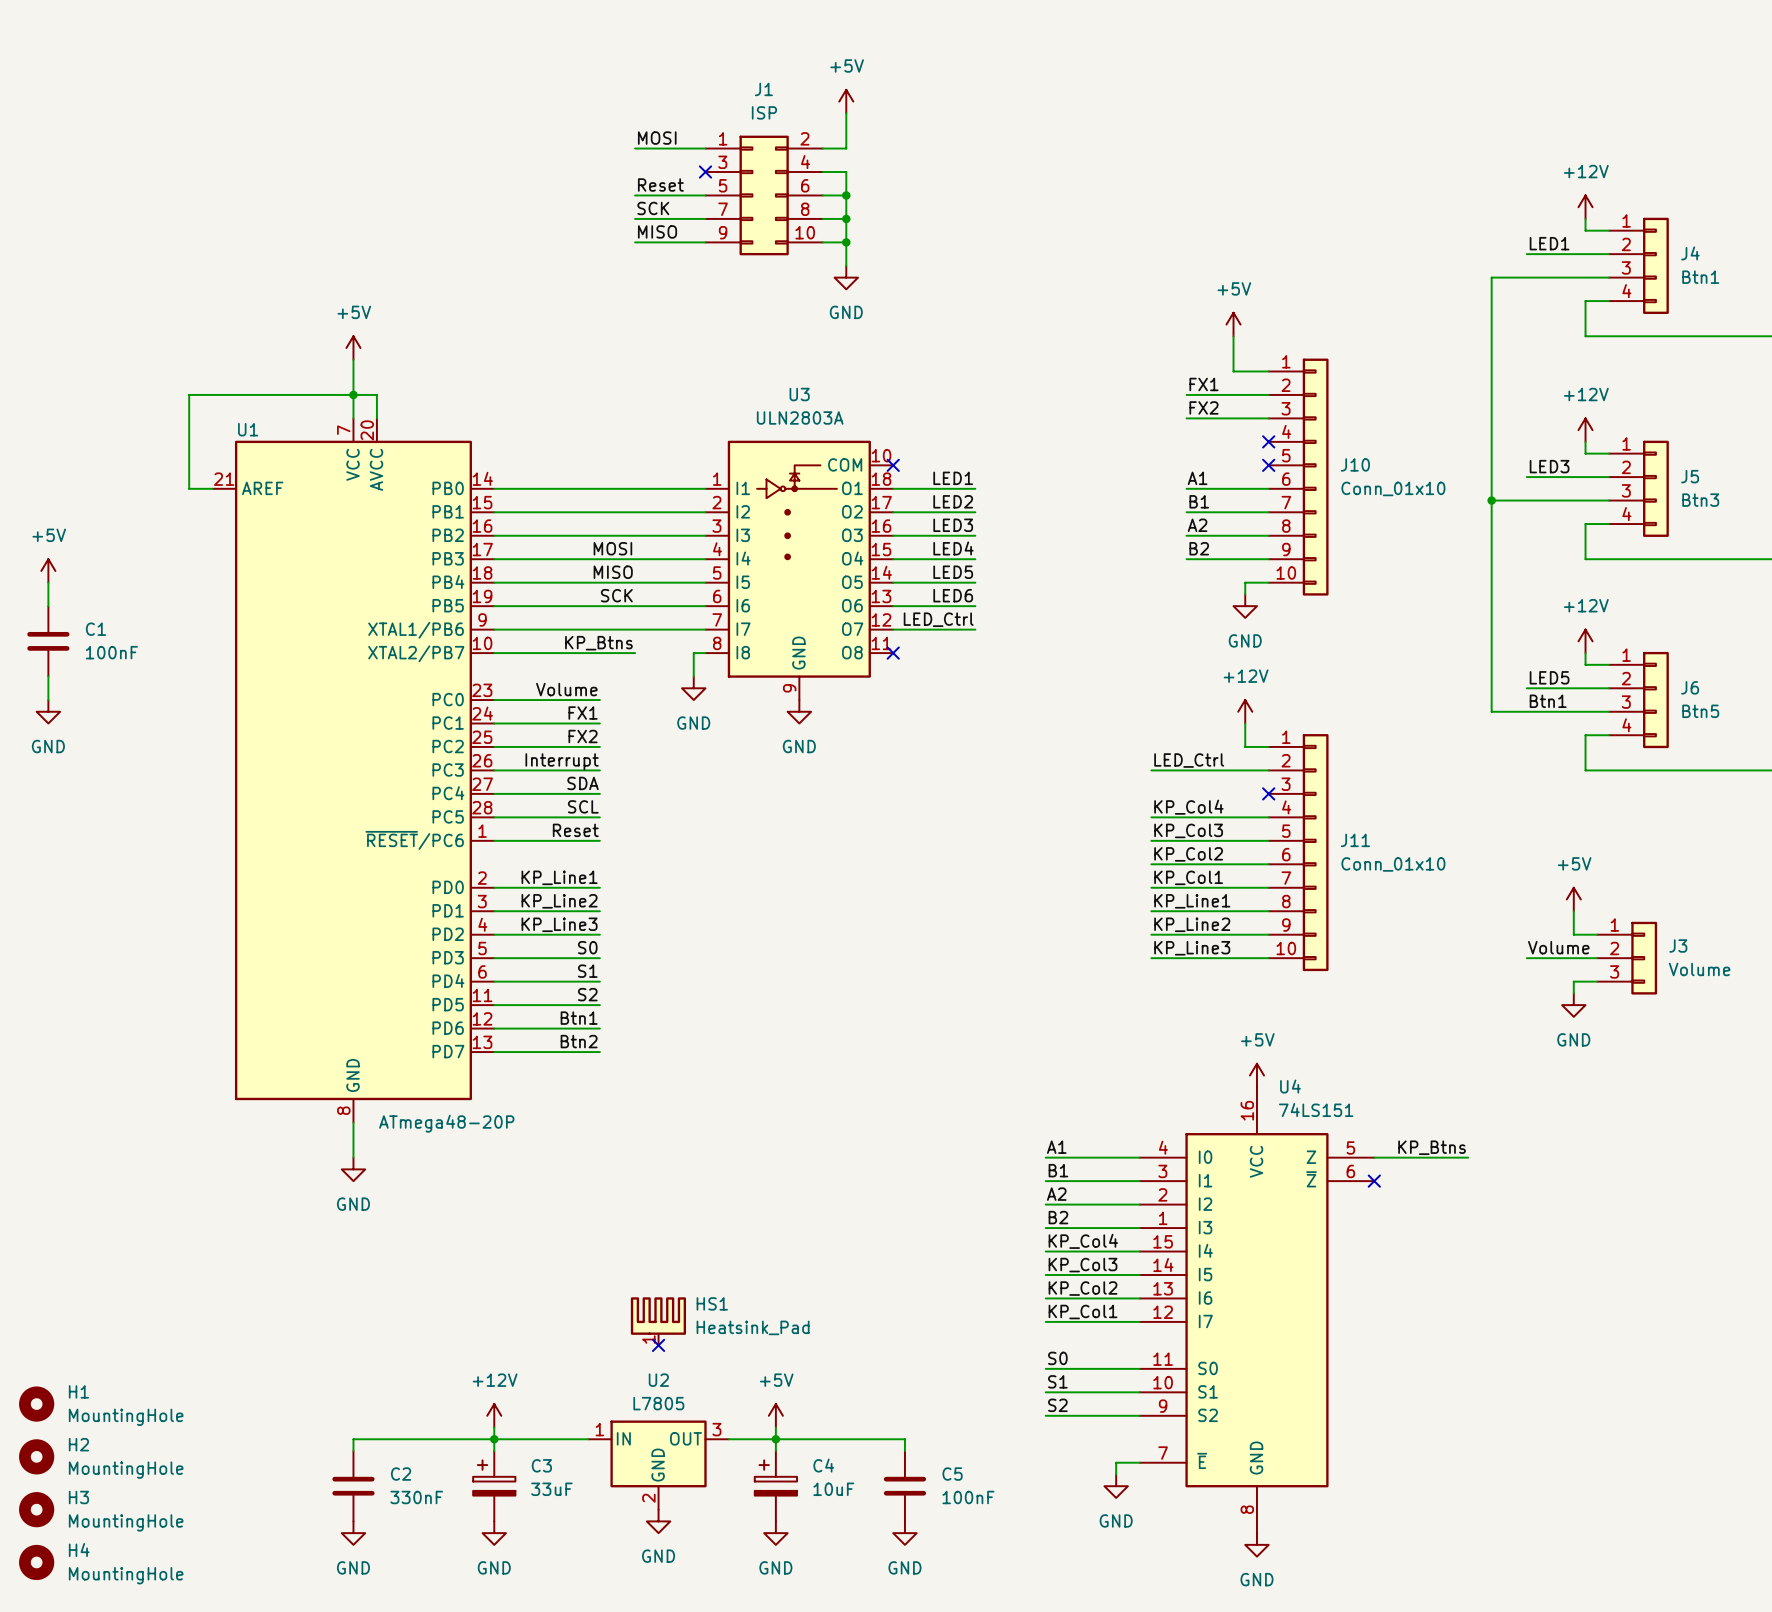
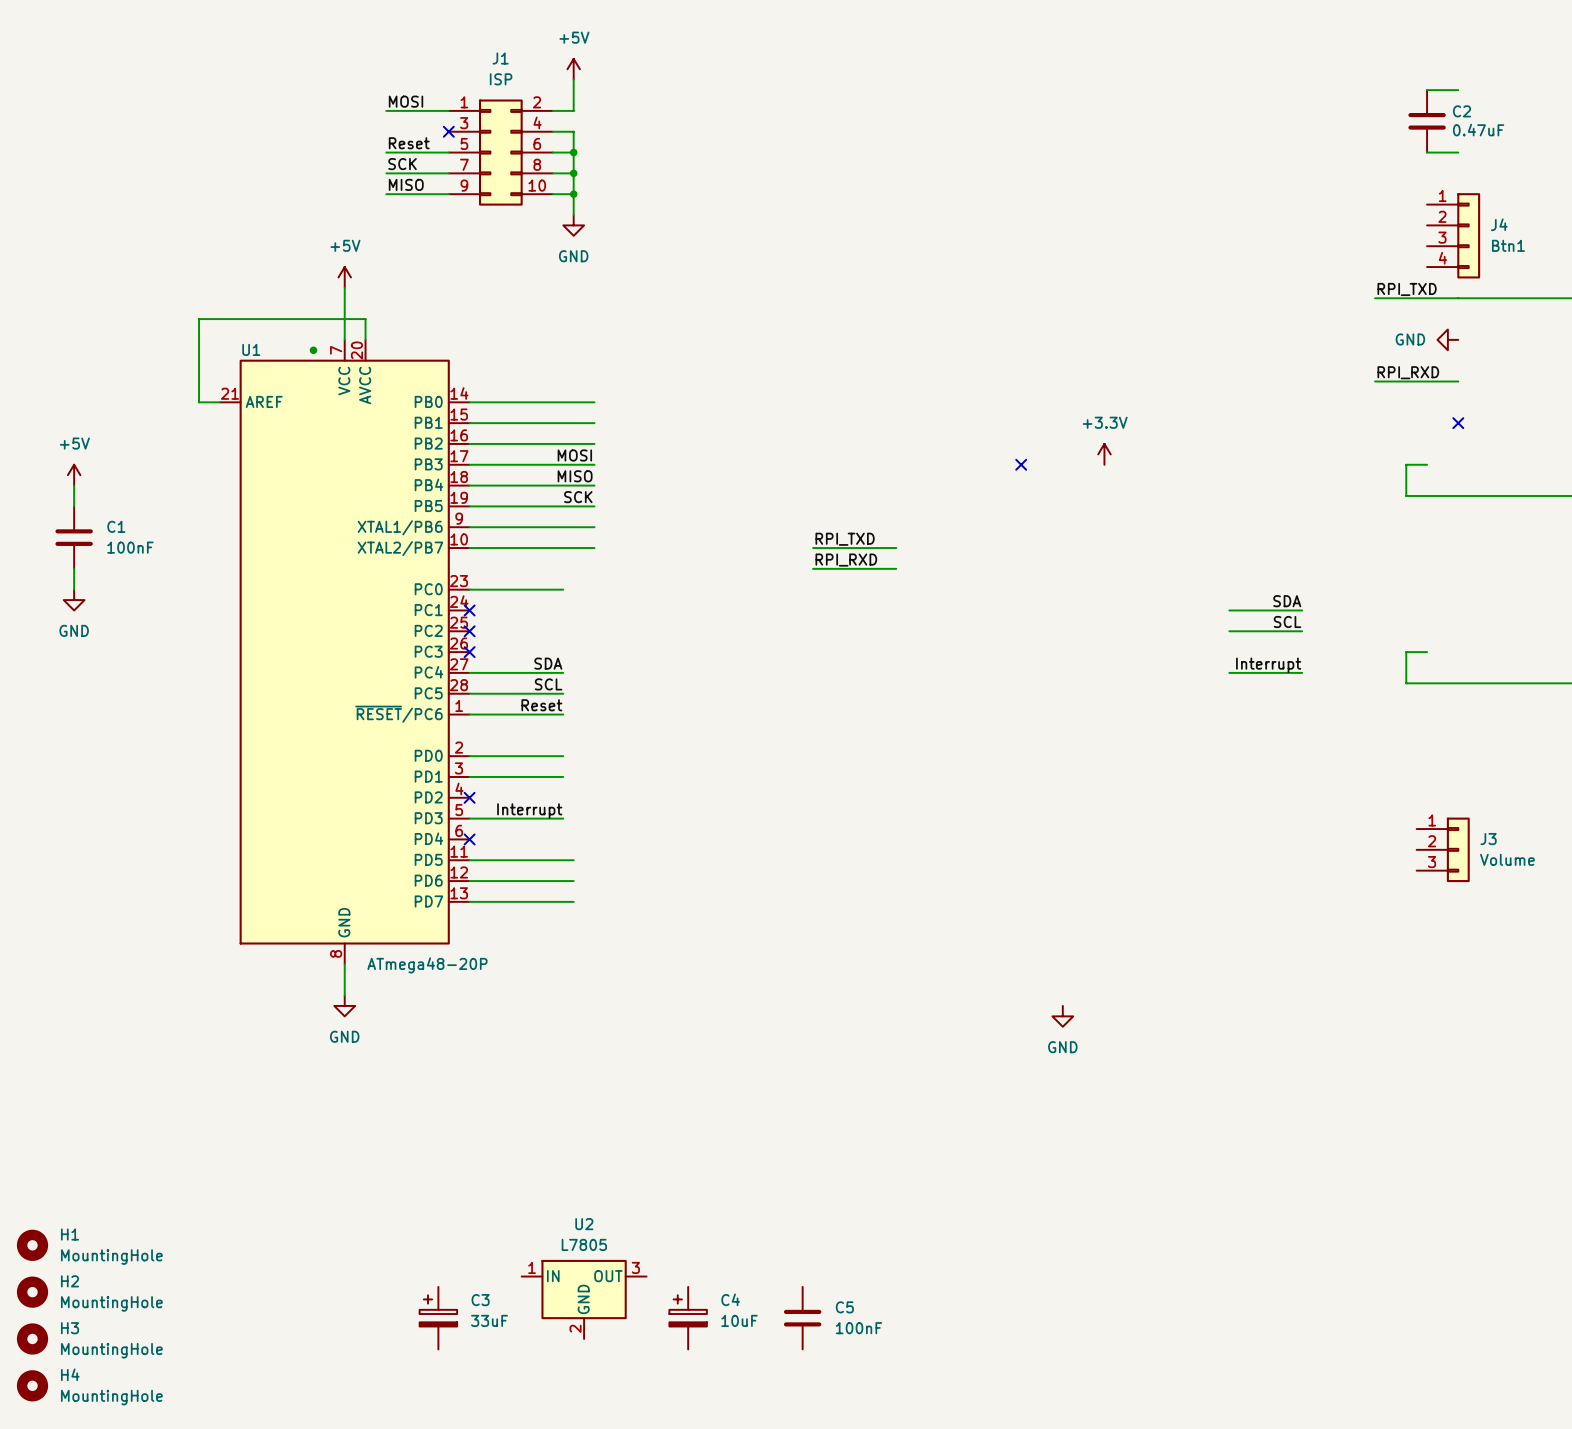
power symbol: none -> +5V (573, 69)
power symbol: +5V (846, 101) -> none
wire: none -> (1427, 90) (1458, 90)
wire: (846, 113) (846, 148) (822, 148) -> (573, 79) (573, 110) (552, 110)
label: none -> MOSI (406, 101)
wire: none -> (386, 110) (448, 110)
label: MOSI (657, 138) -> none
no-connect mark: none -> (448, 131)
wire: none -> (552, 131) (563, 131)
wire: (646, 148) (705, 148) -> (573, 131) (573, 215)
wire: none -> (386, 152) (448, 152)
junction: none -> (573, 152)
no-connect mark: (705, 172) -> none
wire: (822, 172) (846, 172) (846, 265) -> none
wire: none -> (1427, 152) (1458, 152)
label: none -> SCK (402, 164)
label position: Reset (660, 185) -> Reset (409, 143)
wire: none -> (386, 173) (448, 173)
wire: none -> (552, 173) (563, 173)
wire: (646, 195) (705, 195) -> none
junction: none -> (573, 173)
J1 position: (764, 195) -> (500, 152)
wire: (822, 195) (846, 195) -> (552, 152) (573, 152)
junction: (846, 195) -> none
power symbol: +12V (1585, 207) -> none
label: none -> MISO (406, 184)
label: SCK (653, 208) -> none
wire: none -> (552, 194) (563, 194)
wire: (646, 218) (705, 218) -> none
junction: none -> (573, 194)
wire: (822, 218) (846, 218) -> none
junction: (846, 218) -> none
wire: (1585, 218) (1585, 230) (1608, 230) -> none
label: MISO (657, 231) -> none
wire: (635, 242) (705, 242) -> (386, 194) (448, 194)
wire: (822, 242) (846, 242) -> none
junction: (846, 242) -> none
label: LED1 (1549, 243) -> none
wire: (1526, 254) (1608, 254) -> none
power symbol position: GND (846, 277) -> GND (573, 225)
wire: (1608, 277) (1491, 277) (1491, 711) (1608, 711) -> none
wire: (1608, 301) (1585, 301) (1585, 336) -> (1375, 298) (1406, 298)
power symbol: +5V (1233, 324) -> none
label: none -> RPI_TXD (1407, 289)
wire: (1233, 336) (1233, 371) (1268, 371) -> none
power symbol position: +5V (353, 348) -> +5V (344, 277)
wire: (353, 359) (353, 418) -> (344, 287) (344, 339)
power symbol: none -> GND (1447, 339)
label: FX1 (1203, 384) -> none
wire: (1186, 394) (1268, 394) -> none
label: FX2 (1203, 407) -> none
wire: (376, 418) (376, 394) (189, 394) (189, 488) (212, 488) -> (365, 339) (365, 319) (199, 319) (199, 402) (219, 402)
wire: (1186, 418) (1268, 418) -> none
label: none -> RPI_RXD (1408, 372)
wire: none -> (1375, 381) (1458, 381)
power symbol: +12V (1585, 430) -> none
no-connect mark: (1268, 441) -> none
wire: (1585, 441) (1585, 453) (1608, 453) -> none
wire: none -> (469, 402) (594, 402)
no-connect mark: (893, 465) -> none
no-connect mark: (1268, 465) -> none
label: LED3 (1549, 466) -> none
wire: none -> (469, 423) (594, 423)
J10: Conn_01x10 (1298, 477) -> none
wire: (1526, 477) (1608, 477) -> none
no-connect mark: none -> (1458, 423)
label: LED1 (953, 478) -> none
label: A1 (1197, 478) -> none
wire: (494, 488) (705, 488) -> none
wire: (893, 488) (975, 488) -> none
wire: (1186, 488) (1268, 488) -> none
J5: Btn3 (1638, 488) -> none
wire: none -> (469, 443) (594, 443)
wire: (1491, 500) (1608, 500) -> none
junction: (1491, 500) -> none
label: LED2 (953, 501) -> none
label: B1 (1199, 501) -> none
wire: (494, 512) (705, 512) -> none
wire: (893, 512) (975, 512) -> none
wire: (1186, 512) (1268, 512) -> none
power symbol: none -> +3.3V (1104, 454)
wire: none -> (469, 464) (594, 464)
no-connect mark: none -> (1021, 464)
label: LED3 (953, 525) -> none
label: A2 (1197, 525) -> none
wire: (494, 535) (705, 535) -> none
wire: (893, 535) (975, 535) -> none
wire: (1186, 535) (1268, 535) -> none
wire: none -> (469, 485) (594, 485)
label position: MOSI (612, 548) -> MOSI (574, 455)
label: LED4 (953, 548) -> none
label: B2 (1199, 548) -> none
wire: (494, 559) (705, 559) -> none
wire: (893, 559) (975, 559) -> none
wire: (1186, 559) (1268, 559) -> none
power symbol position: +5V (48, 570) -> +5V (74, 475)
wire: none -> (469, 506) (594, 506)
U3: ULN2803A (799, 570) -> none
label position: MISO (613, 572) -> MISO (575, 476)
label: LED5 (953, 572) -> none
wire: (48, 582) (48, 606) -> (74, 485) (74, 506)
wire: (494, 582) (705, 582) -> none
wire: (893, 582) (975, 582) -> none
wire: (1268, 582) (1245, 582) (1245, 594) -> none
wire: none -> (469, 527) (594, 527)
label position: SCK (616, 595) -> SCK (578, 497)
label: LED6 (953, 595) -> none
wire: (494, 606) (705, 606) -> none
wire: (893, 606) (975, 606) -> none
power symbol: GND (1245, 606) -> none
label: none -> RPI_TXD (845, 539)
wire: none -> (813, 548) (896, 548)
label: LED_Ctrl (938, 619) -> none
wire: (494, 629) (705, 629) -> none
wire: (893, 629) (975, 629) -> none
label: none -> RPI_RXD (846, 560)
C1 position: (48, 641) -> (74, 537)
wire: none -> (813, 568) (896, 568)
power symbol: +12V (1585, 641) -> none
label: KP_Btns (598, 643) -> none
wire: (494, 653) (635, 653) -> (469, 548) (594, 548)
wire: (705, 653) (693, 653) (693, 676) -> none
no-connect mark: (893, 653) -> none
wire: (1585, 653) (1585, 664) (1608, 664) -> none
wire: (48, 676) (48, 700) -> (74, 568) (74, 589)
label: none -> SDA (1287, 601)
label: LED5 (1549, 677) -> none
no-connect mark: none -> (469, 610)
power symbol: GND (693, 688) -> none
wire: (1526, 688) (1608, 688) -> (1229, 610) (1302, 610)
label: Volume (566, 689) -> none
wire: (494, 700) (599, 700) -> (469, 589) (563, 589)
J6: Btn5 (1638, 700) -> none
label: none -> SCL (1287, 622)
label: Btn1 (1548, 701) -> none
power symbol position: GND (48, 711) -> GND (74, 600)
no-connect mark: none -> (469, 631)
power symbol: GND (799, 711) -> none
power symbol: +12V (1245, 711) -> none
wire: none -> (1229, 631) (1302, 631)
label: FX1 (583, 713) -> none
wire: (494, 723) (599, 723) -> none
wire: (1245, 723) (1245, 746) (1268, 746) -> none
no-connect mark: none -> (469, 652)
label: FX2 (583, 736) -> none
wire: (494, 746) (599, 746) -> none
label: none -> Interrupt (1268, 665)
wire: none -> (1229, 672) (1302, 672)
label: LED_Ctrl (1189, 760) -> none
label position: Interrupt (562, 761) -> Interrupt (529, 811)
U1 position: (353, 770) -> (344, 652)
wire: (494, 770) (599, 770) -> none
wire: (1151, 770) (1268, 770) -> none
label position: SDA (583, 783) -> SDA (548, 663)
wire: (494, 793) (599, 793) -> (469, 672) (563, 672)
no-connect mark: (1268, 793) -> none
label position: SCL (583, 806) -> SCL (548, 684)
label: KP_Col4 (1188, 807) -> none
wire: (494, 817) (599, 817) -> (469, 693) (563, 693)
wire: (1151, 817) (1268, 817) -> none
label position: Reset (575, 830) -> Reset (541, 705)
label: KP_Col3 (1188, 830) -> none
wire: (494, 840) (599, 840) -> (469, 714) (563, 714)
wire: (1151, 840) (1268, 840) -> none
J11: Conn_01x10 (1298, 852) -> none
label: KP_Col2 (1188, 854) -> none
wire: (1151, 864) (1268, 864) -> none
label: KP_Line1 (559, 877) -> none
label: KP_Col1 (1188, 877) -> none
wire: (494, 887) (599, 887) -> (469, 756) (563, 756)
wire: (1151, 887) (1268, 887) -> none
no-connect mark: none -> (469, 797)
power symbol: +5V (1573, 899) -> none
label: KP_Line2 (559, 901) -> none
label: KP_Line1 (1192, 901) -> none
wire: (494, 911) (599, 911) -> (469, 776) (563, 776)
wire: (1151, 911) (1268, 911) -> none
wire: (1573, 911) (1573, 934) (1597, 934) -> none
label: KP_Line3 (559, 924) -> none
label: KP_Line2 (1192, 924) -> none
wire: (494, 934) (599, 934) -> none
wire: (1151, 934) (1268, 934) -> none
no-connect mark: none -> (469, 839)
label: S0 (587, 947) -> none
label: Volume (1558, 947) -> none
label: KP_Line3 (1192, 948) -> none
wire: (494, 958) (599, 958) -> (469, 818) (563, 818)
wire: (1151, 958) (1268, 958) -> none
wire: (1526, 958) (1597, 958) -> none
wire: none -> (469, 860) (573, 860)
label: S1 (587, 971) -> none
wire: (494, 981) (599, 981) -> none
wire: (1597, 981) (1573, 981) (1573, 993) -> none
wire: none -> (469, 881) (573, 881)
label: S2 (587, 994) -> none
wire: (494, 1005) (599, 1005) -> none
power symbol: GND (1573, 1005) -> none
wire: none -> (469, 901) (573, 901)
label: Btn1 (579, 1018) -> none
wire: (494, 1028) (599, 1028) -> none
label: Btn2 (579, 1041) -> none
wire: (494, 1052) (599, 1052) -> none
power symbol: +5V (1256, 1075) -> none
wire: (353, 1122) (353, 1157) -> (344, 964) (344, 995)
power symbol: none -> GND (1062, 1016)
label: A1 (1056, 1147) -> none
label: KP_Btns (1432, 1147) -> none
wire: (1045, 1157) (1139, 1157) -> none
wire: (1374, 1157) (1468, 1157) -> none
power symbol position: GND (353, 1169) -> GND (344, 1005)
label: B1 (1058, 1170) -> none
wire: (1045, 1181) (1139, 1181) -> none
no-connect mark: (1374, 1181) -> none
label: A2 (1056, 1194) -> none
wire: (1045, 1204) (1139, 1204) -> none
label: B2 (1058, 1217) -> none
wire: (1045, 1228) (1139, 1228) -> none
label: KP_Col4 (1083, 1241) -> none
wire: (1045, 1251) (1139, 1251) -> none
label: KP_Col3 (1083, 1265) -> none
wire: (1045, 1274) (1139, 1274) -> none
label: KP_Col2 (1083, 1288) -> none
wire: (1045, 1298) (1139, 1298) -> none
U4: 74LS151 (1256, 1310) -> none
label: KP_Col1 (1083, 1312) -> none
HS1: Heatsink_Pad (658, 1321) -> none
wire: (1045, 1321) (1139, 1321) -> none
no-connect mark: (658, 1345) -> none
label: S0 (1057, 1358) -> none
wire: (1045, 1368) (1139, 1368) -> none
label: S1 (1057, 1381) -> none
wire: (1045, 1392) (1139, 1392) -> none
label: S2 (1057, 1405) -> none
power symbol: +12V (494, 1415) -> none
power symbol: +5V (775, 1415) -> none
wire: (1045, 1415) (1139, 1415) -> none
wire: (494, 1427) (494, 1451) -> none
wire: (775, 1427) (775, 1451) -> none
junction: (494, 1439) -> none
wire: (588, 1439) (353, 1439) (353, 1451) -> none
wire: (728, 1439) (904, 1439) (904, 1451) -> none
junction: (775, 1439) -> none
wire: (1139, 1462) (1116, 1462) (1116, 1474) -> none
C2 name position: C2 (401, 1474) -> C2 (1461, 111)
C2 position: (353, 1486) -> (1427, 121)
power symbol: GND (1116, 1486) -> none
C2 value: 330nF (416, 1497) -> 0.47uF (1478, 130)
power symbol: GND (658, 1521) -> none
power symbol: GND (353, 1533) -> none
power symbol: GND (494, 1533) -> none
power symbol: GND (775, 1533) -> none
power symbol: GND (904, 1533) -> none
power symbol: GND (1256, 1544) -> none

